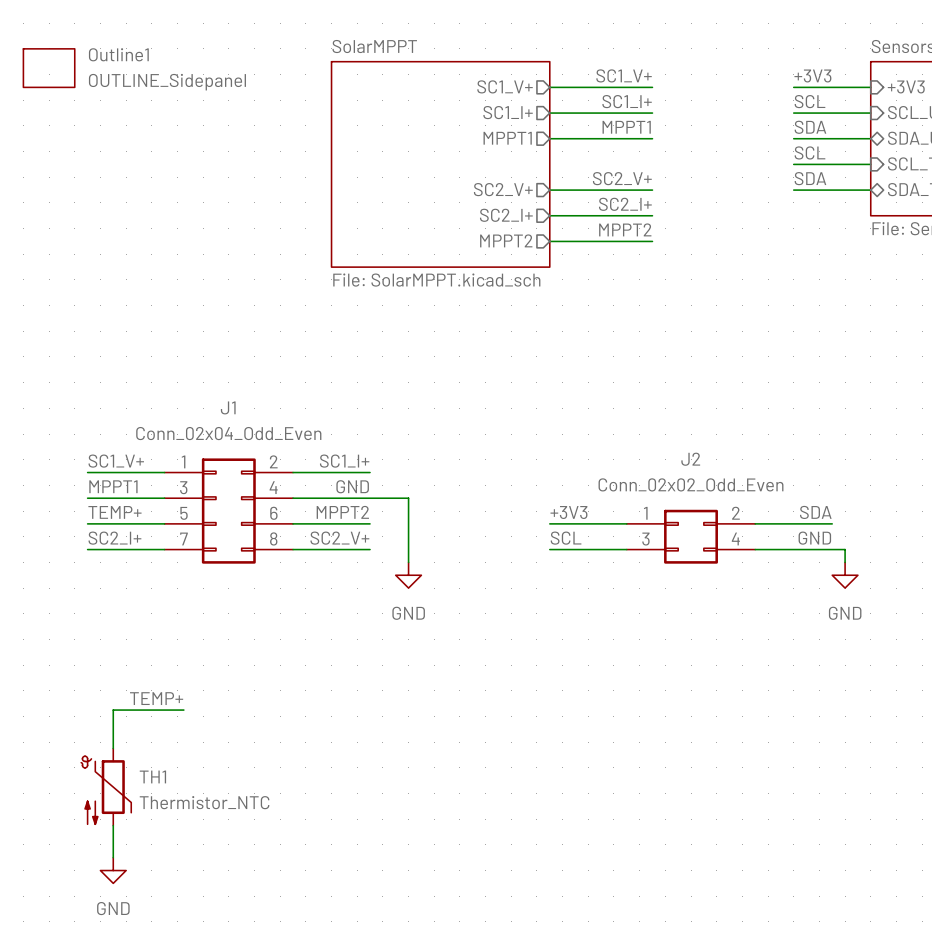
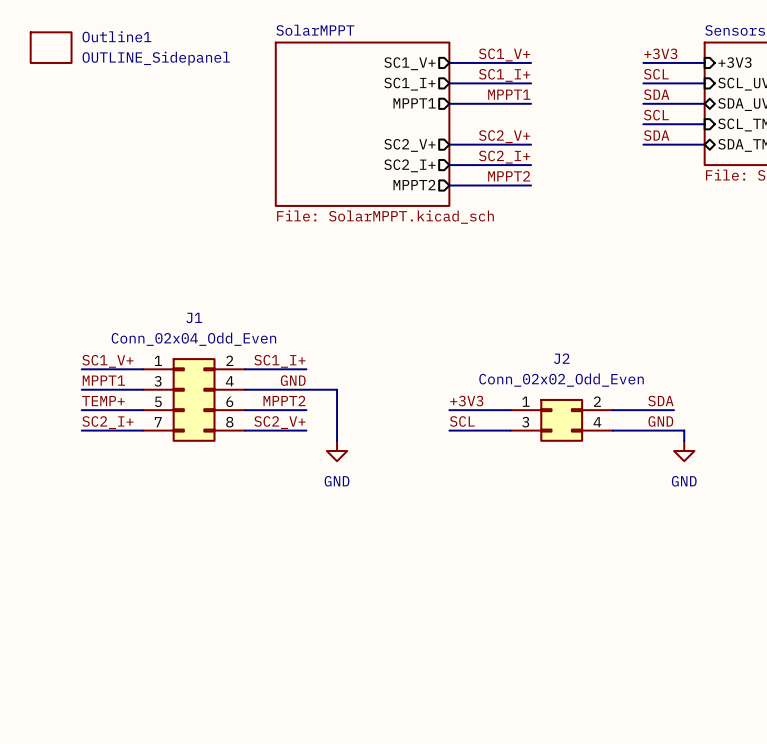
label: TEMP+ (156, 698) -> none
wire: (183, 710) (113, 710) (113, 748) -> none
TH1: Thermistor_NTC (106, 787) -> none
wire: (113, 825) (113, 857) -> none
power symbol: GND (113, 870) -> none

